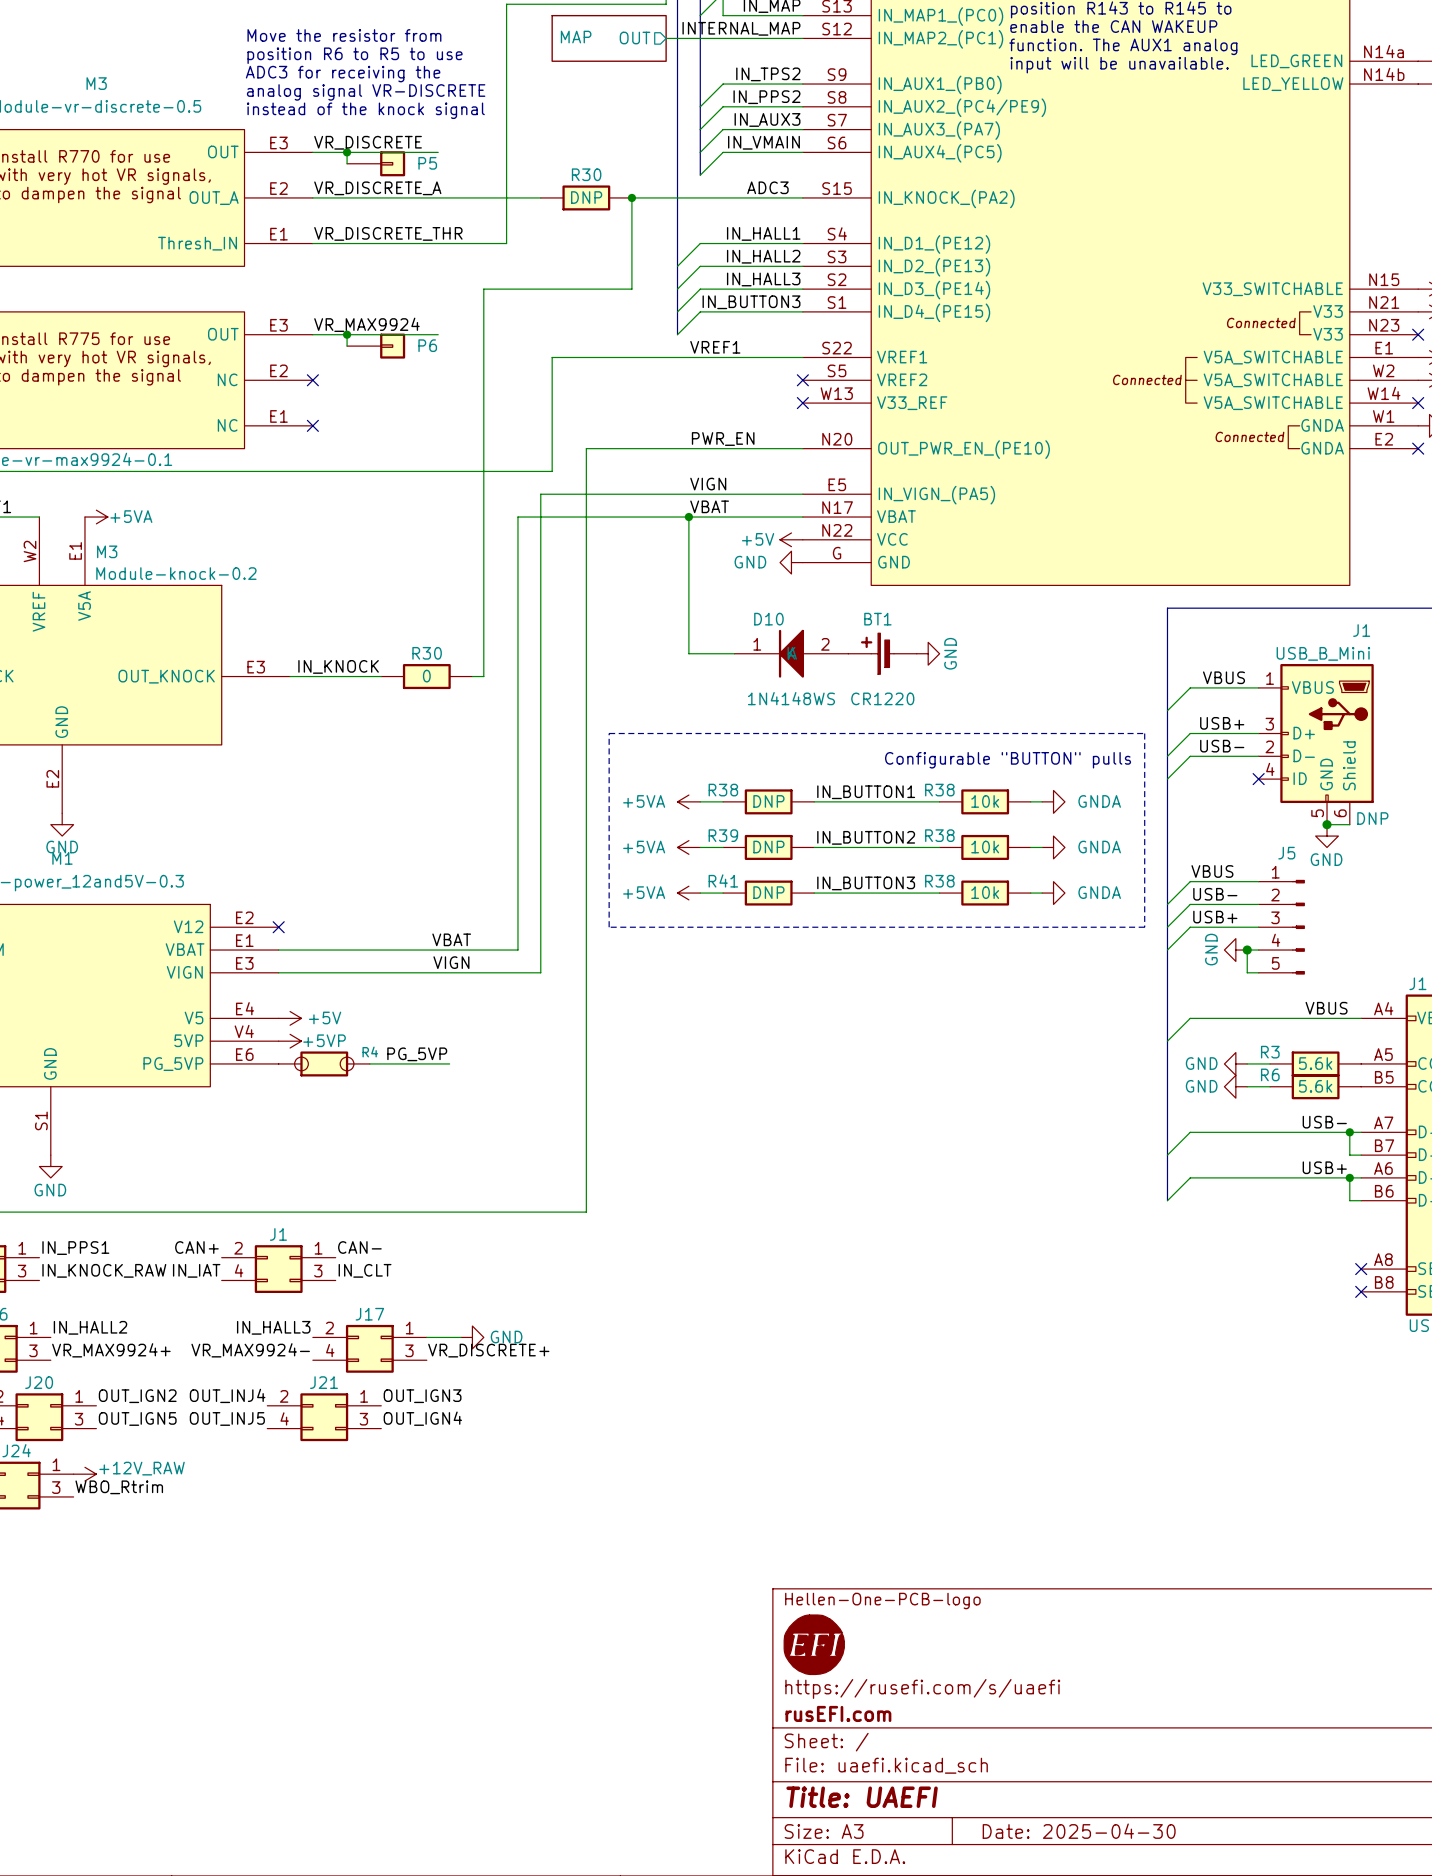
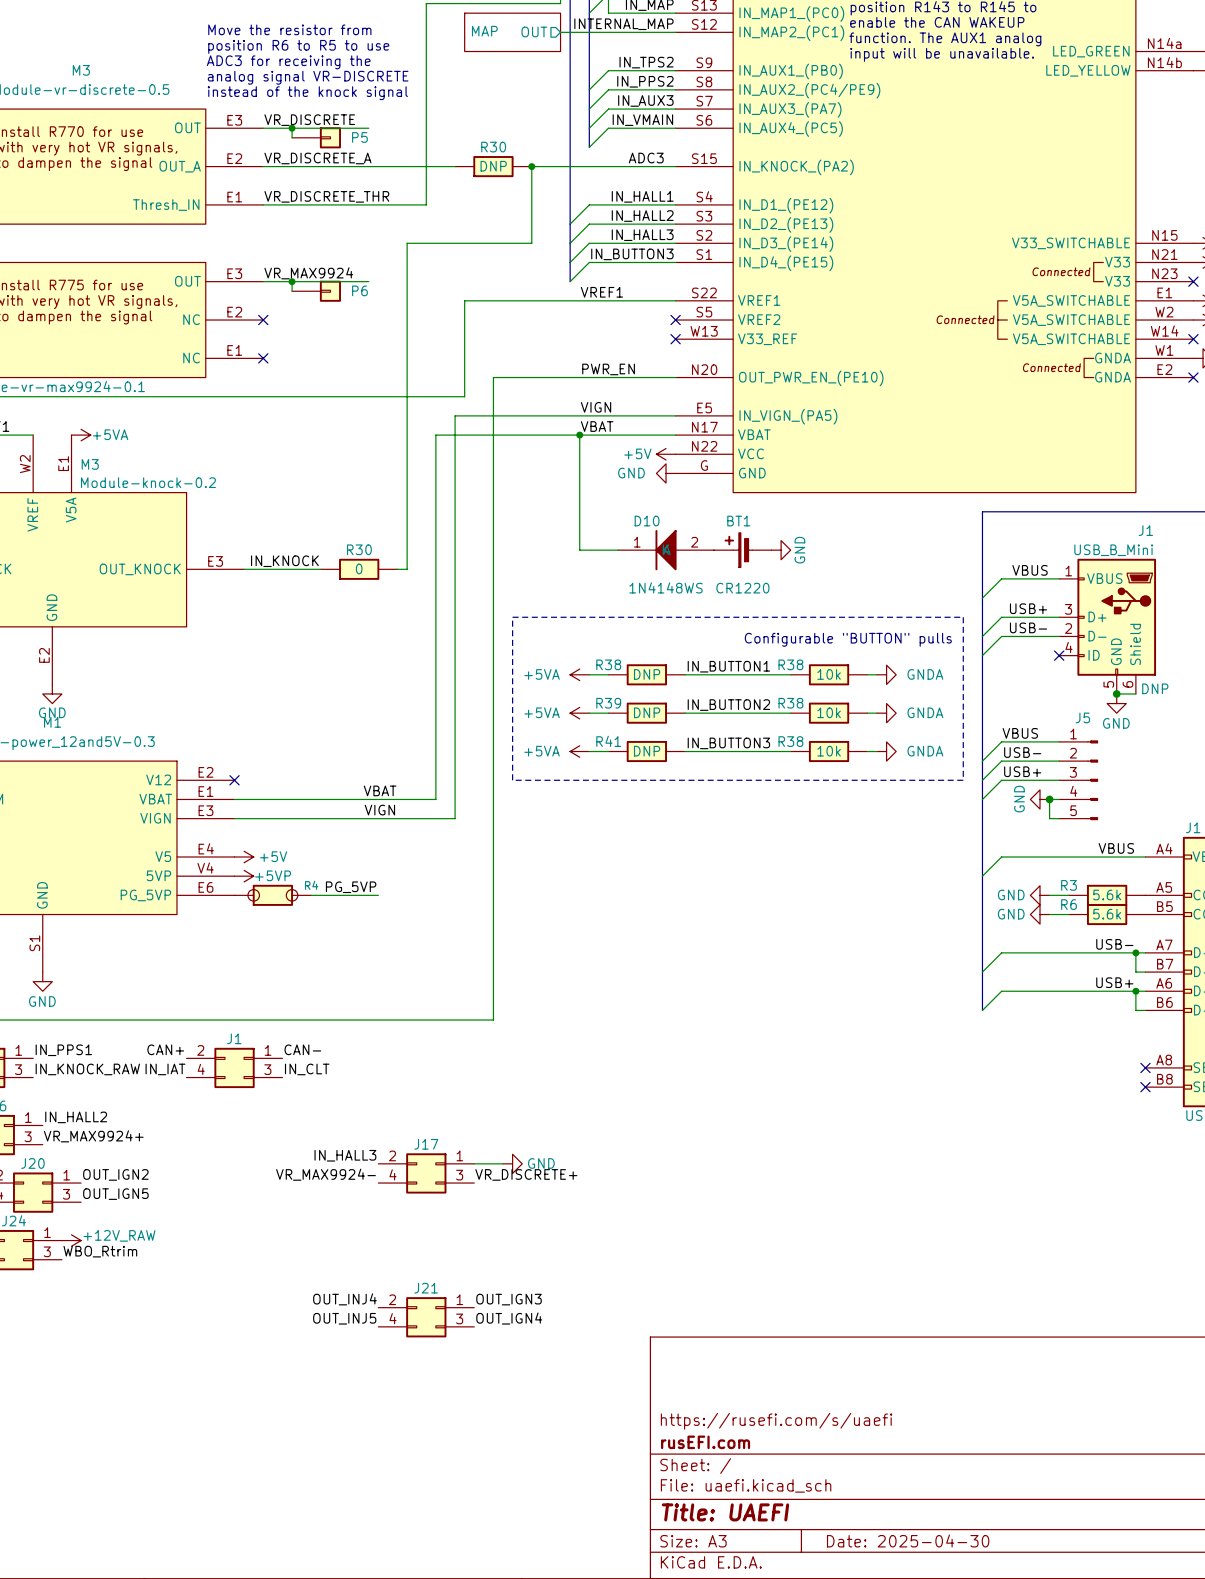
label position: IN_HALL3 (273, 1327) -> IN_HALL3 (345, 1155)
wire: (426, 1337) (461, 1337) -> (474, 1163) (503, 1163)
power symbol position: GND (472, 1337) -> GND (512, 1163)
J17 position: (369, 1348) -> (426, 1173)
label position: VR_MAX9924- (250, 1350) -> VR_MAX9924- (326, 1174)
label position: VR_DISCRETE+ (488, 1350) -> VR_DISCRETE+ (526, 1174)
label: OUT_INJ4 (227, 1395) -> none
label: OUT_IGN3 (422, 1396) -> none
J21 position: (324, 1417) -> (426, 1317)
label: OUT_INJ5 (227, 1418) -> none
label: OUT_IGN4 (422, 1418) -> none
label: none -> OUT_INJ4 (344, 1299)
label: none -> OUT_IGN3 (509, 1299)
label: none -> OUT_IGN4 (509, 1318)
label: none -> OUT_INJ5 (344, 1318)
part: (882, 1600) -> none
part: (814, 1644) -> none

